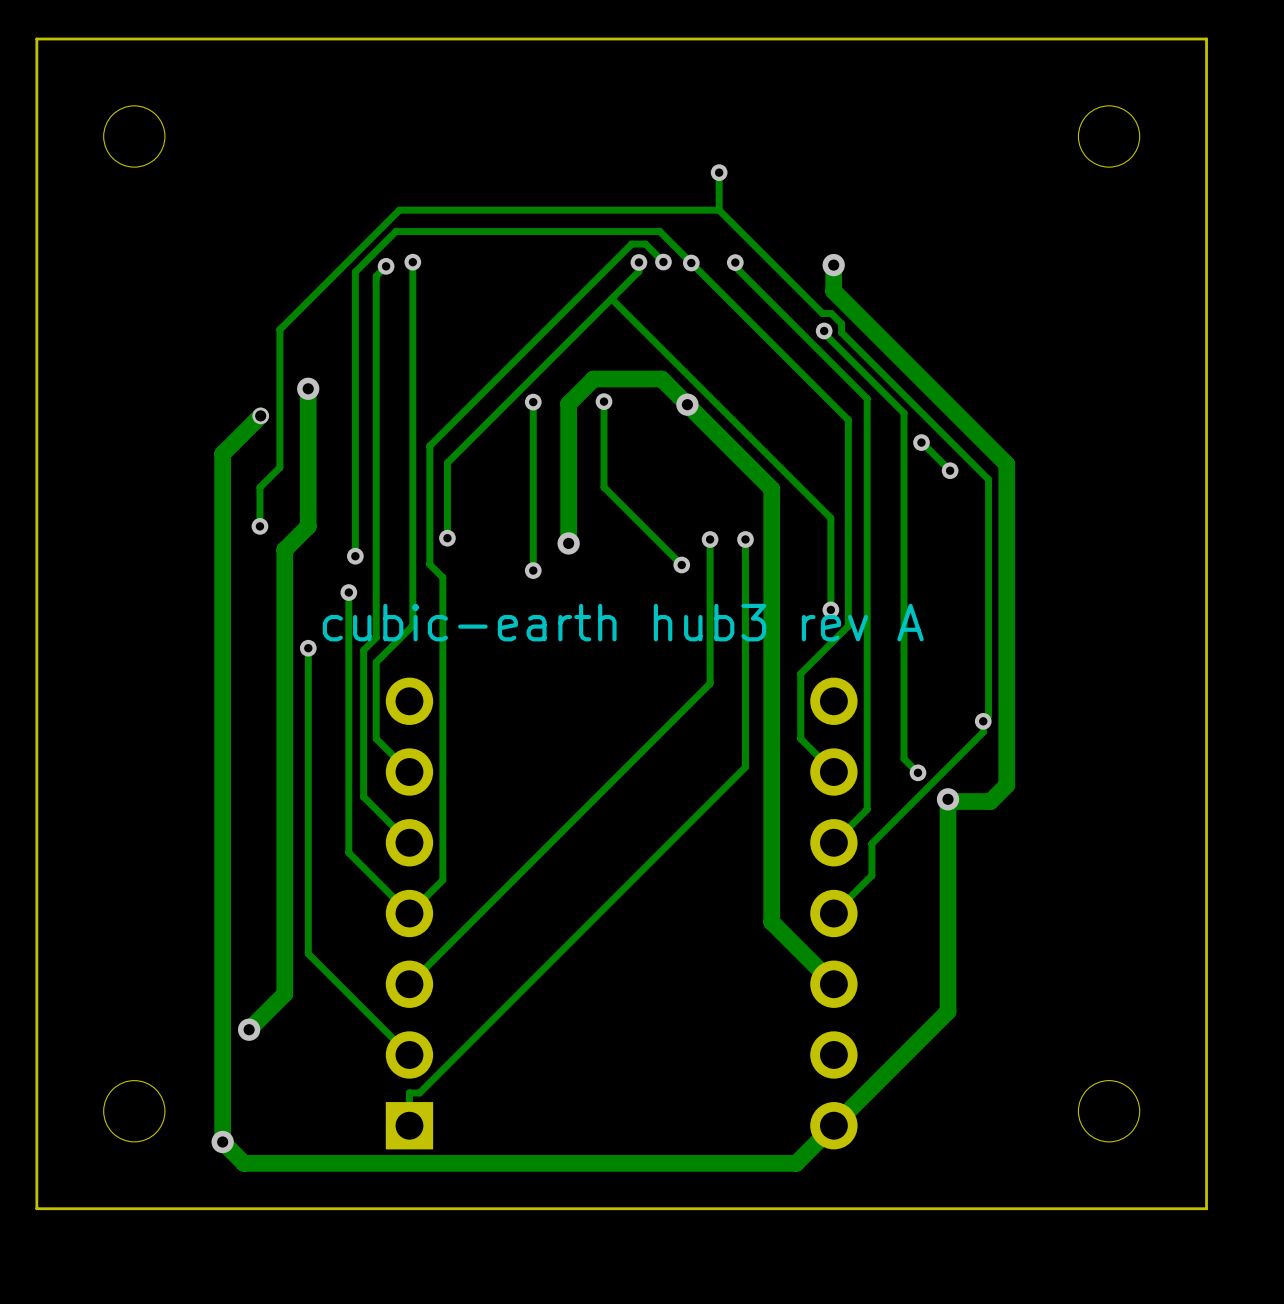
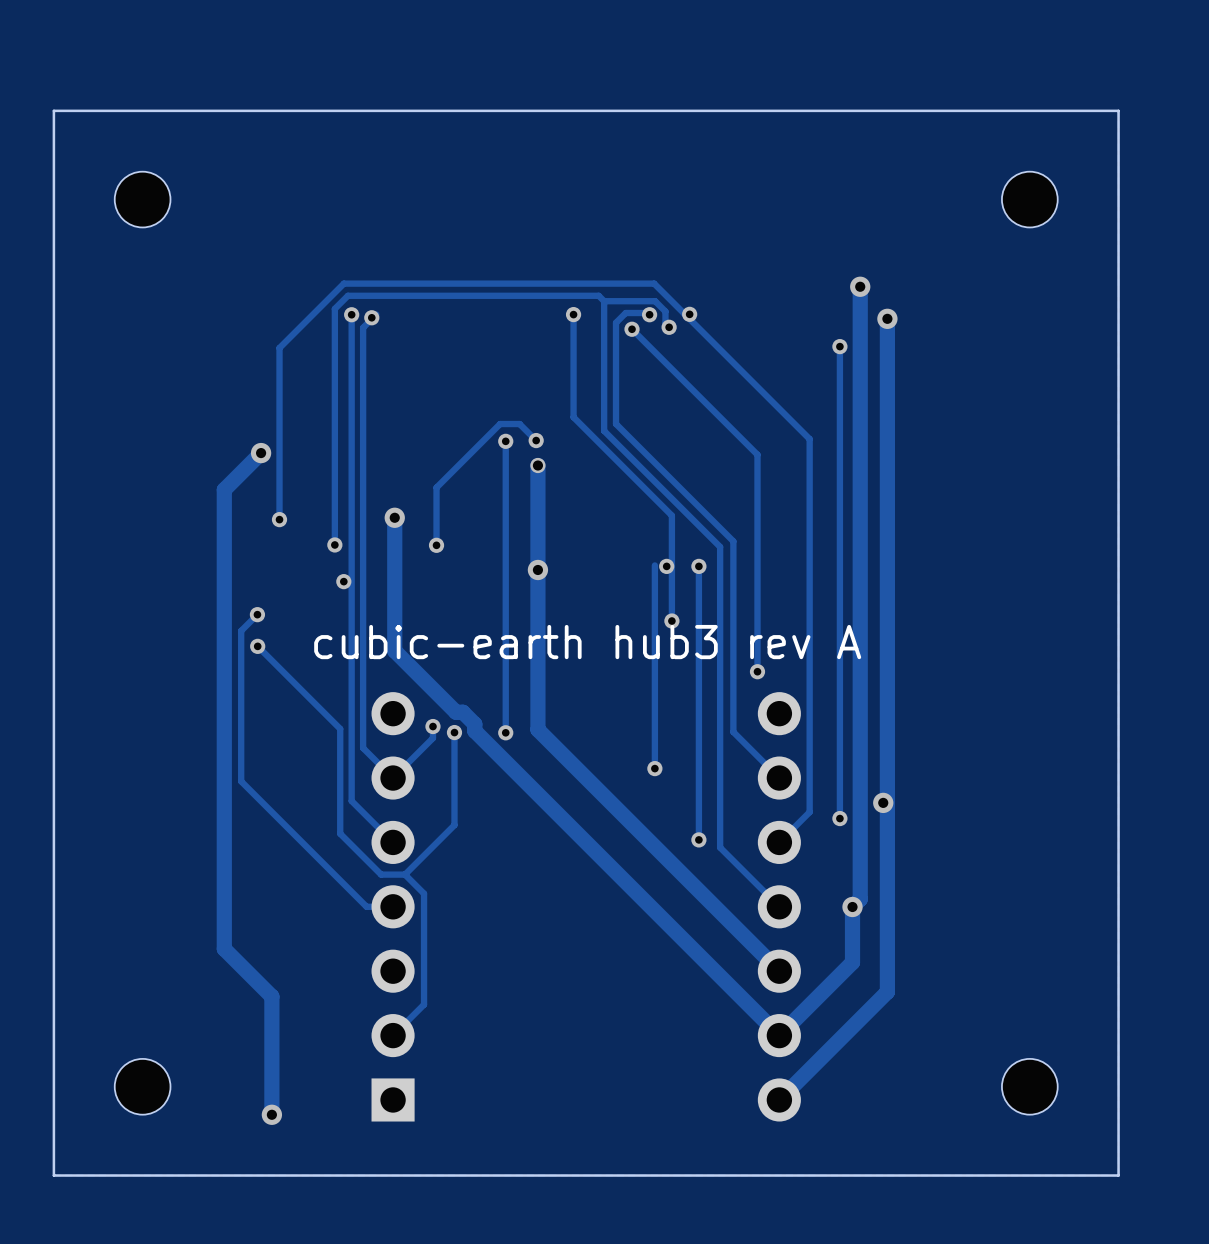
track: (719, 172) (719, 210) -> none
via: (719, 172) -> none
track: (719, 210) (822, 313) (831, 313) (841, 323) (841, 332) (988, 479) (988, 716) (983, 721) (983, 732) (871, 843) (871, 875) (833, 913) -> (604, 301) (604, 430) (720, 546) (720, 847) (779, 906)
track: (719, 210) (399, 210) (279, 329) (279, 467) (259, 487) (259, 526) -> none
track: none -> (860, 286) (860, 899) (852, 907) (852, 962) (779, 1035) (474, 731) (474, 724) (462, 712) (456, 712) (394, 650) (394, 517)
via: none -> (860, 286)
track: none -> (604, 301) (598, 295) (347, 295) (334, 308) (334, 544)
track: none -> (604, 301) (655, 301) (665, 311) (665, 323) (669, 327)
track: (412, 262) (412, 625) (376, 662) (376, 738) -> (376, 314) (363, 327) (363, 748)
via position: (412, 262) -> (351, 314)
track: none -> (573, 314) (573, 417) (671, 515) (671, 621)
via: none -> (573, 314)
track: (638, 262) (638, 271) (447, 462) (447, 538) -> none
via: (638, 262) -> none
track: (663, 262) (645, 244) (631, 244) (429, 445) (429, 564) (442, 577) (442, 880) (409, 913) (348, 852) (348, 592) -> none
via: (663, 262) -> none
track: (735, 262) (735, 266) (867, 399) -> (279, 519) (279, 348) (343, 283) (654, 283) (809, 439)
track: (833, 265) (833, 291) (1006, 464) (1006, 785) (990, 801) (948, 801) -> none
via: (833, 265) -> none
track: (386, 266) (376, 276) (376, 637) (363, 650) (363, 796) -> (351, 314) (351, 801)
via: none -> (887, 318)
via: none -> (669, 327)
track: none -> (632, 329) (757, 454) (757, 671)
via: none -> (632, 329)
track: (611, 298) (830, 518) (830, 609) -> none
track: none -> (839, 346) (839, 818)
via: none -> (839, 346)
track: (824, 330) (824, 333) (904, 413) (904, 758) (918, 772) -> none
via: (824, 330) -> none
track: (308, 388) (308, 526) (284, 549) (284, 994) (249, 1029) -> none
via position: (308, 388) -> (261, 453)
track: none -> (536, 440) (519, 424) (500, 424) (436, 487) (436, 545)
track: (604, 401) (604, 487) (681, 565) -> none
via position: (604, 401) -> (536, 440)
via: (687, 404) -> none
track: none -> (261, 453) (224, 489) (224, 948) (271, 996) (271, 1114)
track: (260, 415) (222, 453) (222, 1142) (244, 1163) (796, 1163) (833, 1125) -> none
via: (260, 415) -> none
track: (568, 428) (568, 403) (593, 379) (661, 379) (771, 488) (771, 922) -> (537, 569) (537, 729) (722, 914)
via: none -> (537, 465)
via: (921, 442) -> none
track: (922, 442) (950, 470) -> none
via: (950, 470) -> none
via: none -> (394, 517)
via: none -> (279, 519)
via: none -> (334, 544)
via: (259, 526) -> none
via position: (447, 538) -> (436, 545)
track: none -> (654, 565) (654, 768)
track: (710, 539) (710, 683) (409, 984) -> none
track: (355, 556) (355, 272) (395, 231) (659, 231) (848, 420) (848, 626) (800, 673) (800, 738) -> (649, 318) (644, 313) (625, 313) (616, 322) (616, 423) (733, 541) (733, 732) (749, 747)
via position: (681, 565) -> (671, 621)
track: none -> (505, 594) (505, 732)
via: (533, 570) -> none
track: none -> (257, 614) (241, 630) (241, 781) (366, 906) (393, 906)
via: none -> (257, 614)
via: (348, 592) -> none
via position: (830, 609) -> (757, 671)
track: none -> (257, 646) (340, 728) (340, 833) (381, 874) (404, 874)
via: none -> (257, 646)
track: (308, 648) (308, 953) (409, 1054) -> (404, 874) (424, 893) (424, 1004) (393, 1035)
via: (308, 648) -> none
track: none -> (432, 726) (432, 738) (393, 778)
via: none -> (432, 726)
via: (983, 721) -> none
track: none -> (454, 732) (454, 825) (404, 874)
via: none -> (454, 732)
via: none -> (505, 732)
via: none -> (654, 768)
track: (745, 767) (419, 1092) (409, 1092) (409, 1125) -> (698, 773) (698, 839)
via position: (918, 772) -> (839, 818)
track: (948, 799) (948, 1011) -> (887, 318) (887, 991) (883, 996)
via: none -> (698, 839)
via: none -> (852, 907)
via: (249, 1029) -> none
via position: (222, 1142) -> (271, 1114)

